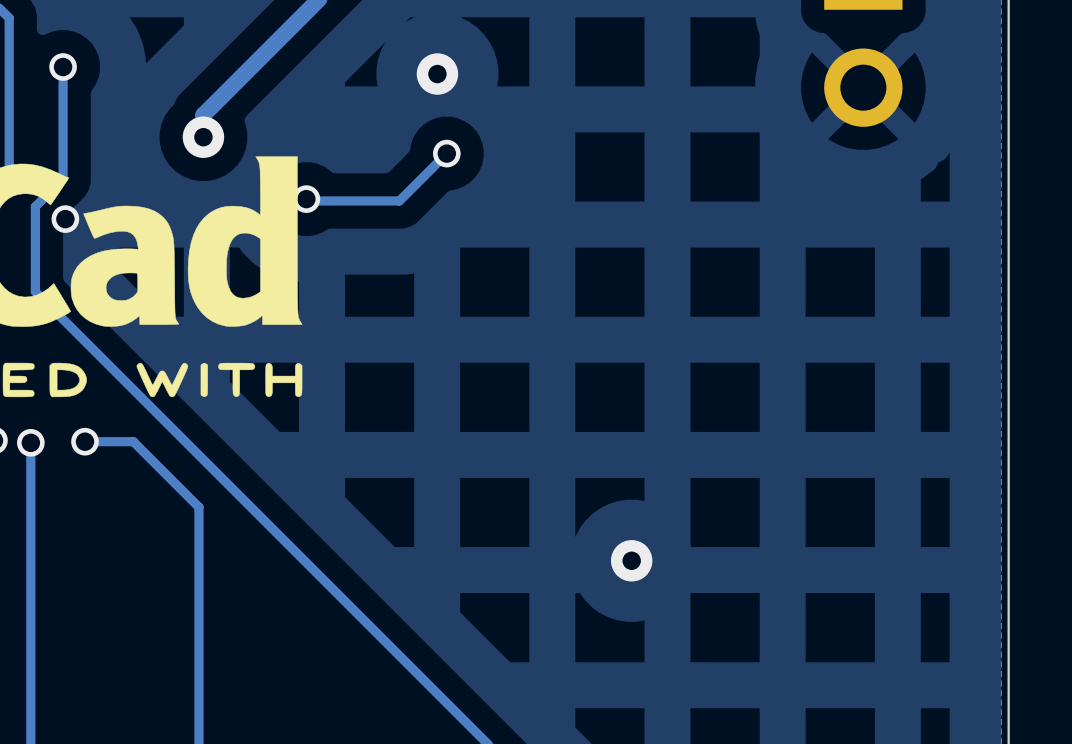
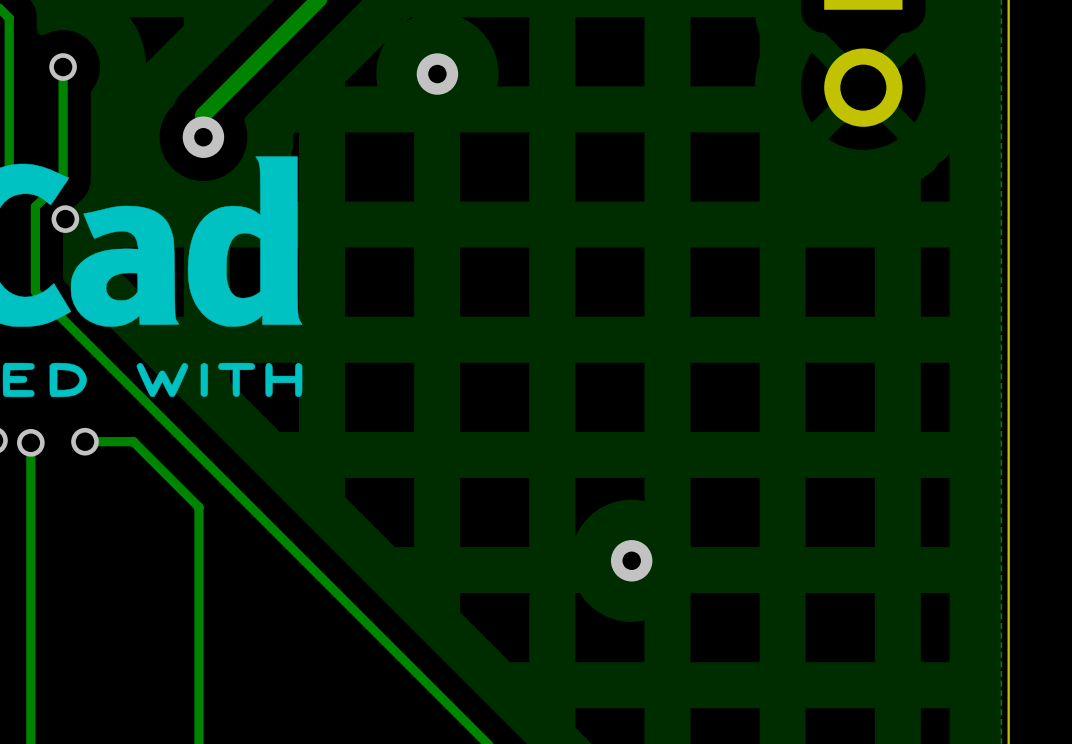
track: (446, 153) (399, 200) (308, 200) (306, 199) -> none
via: (446, 153) -> none
via: (306, 199) -> none

